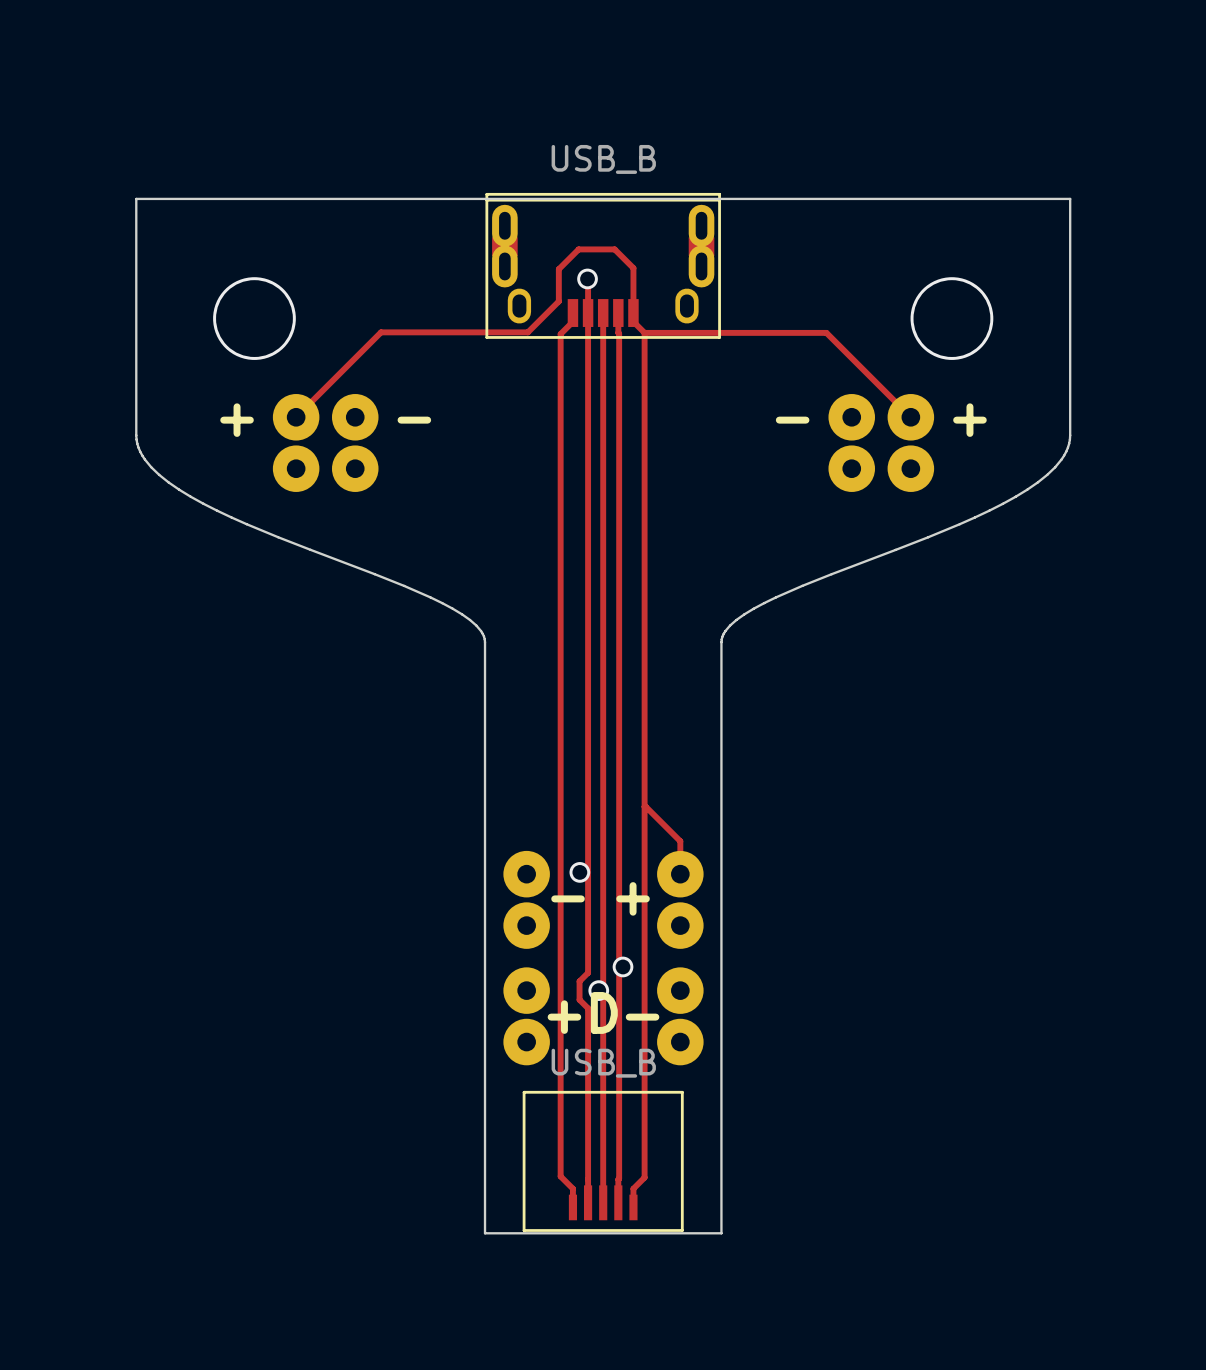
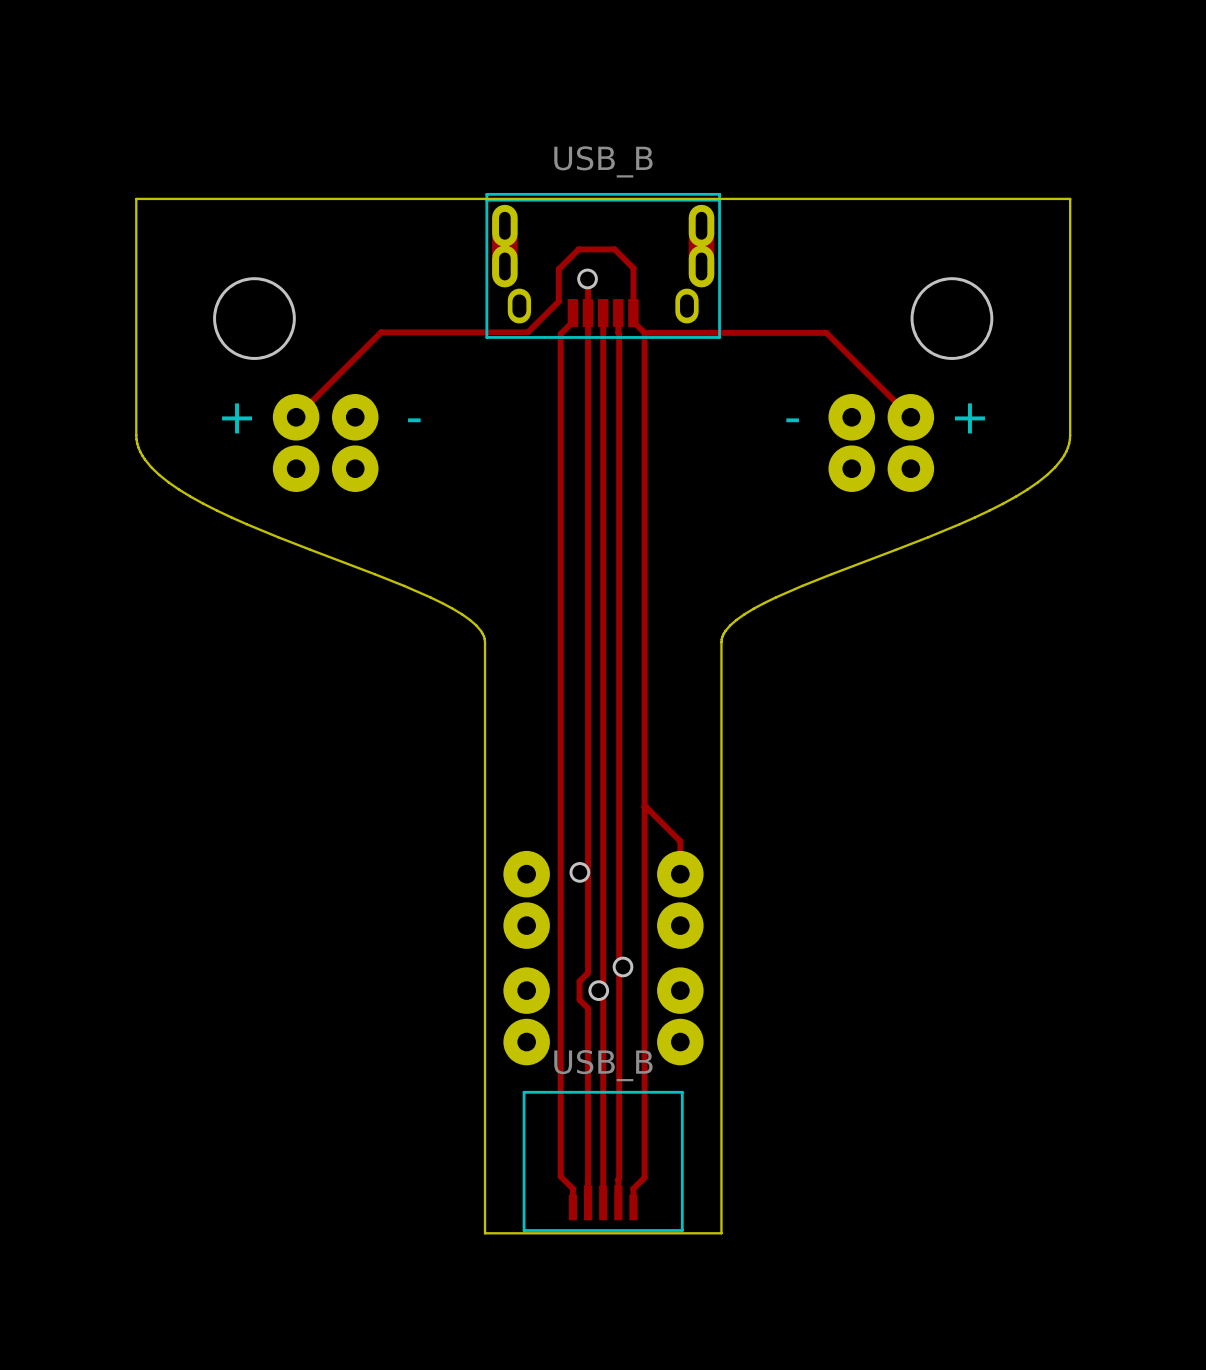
text: - (568, 898) -> none
text: + (633, 898) -> none
text: +D- (603, 1012) -> none

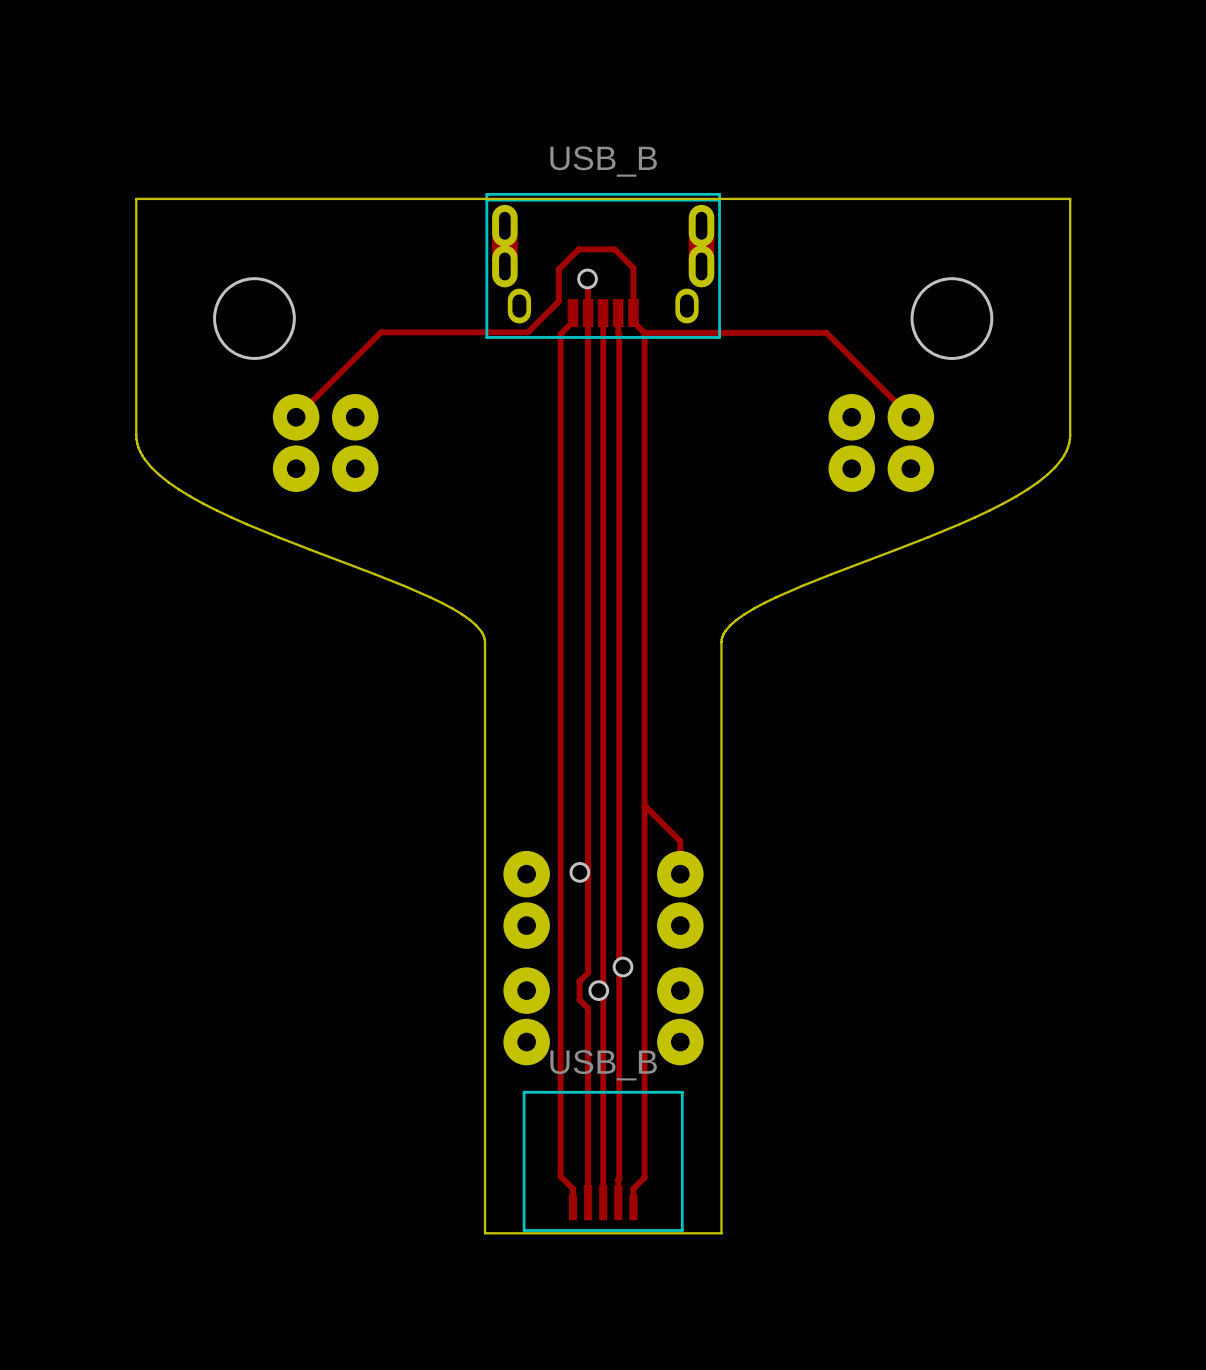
text: + (237, 418) -> none
text: + (969, 418) -> none
text: - (414, 420) -> none
text: - (792, 420) -> none

